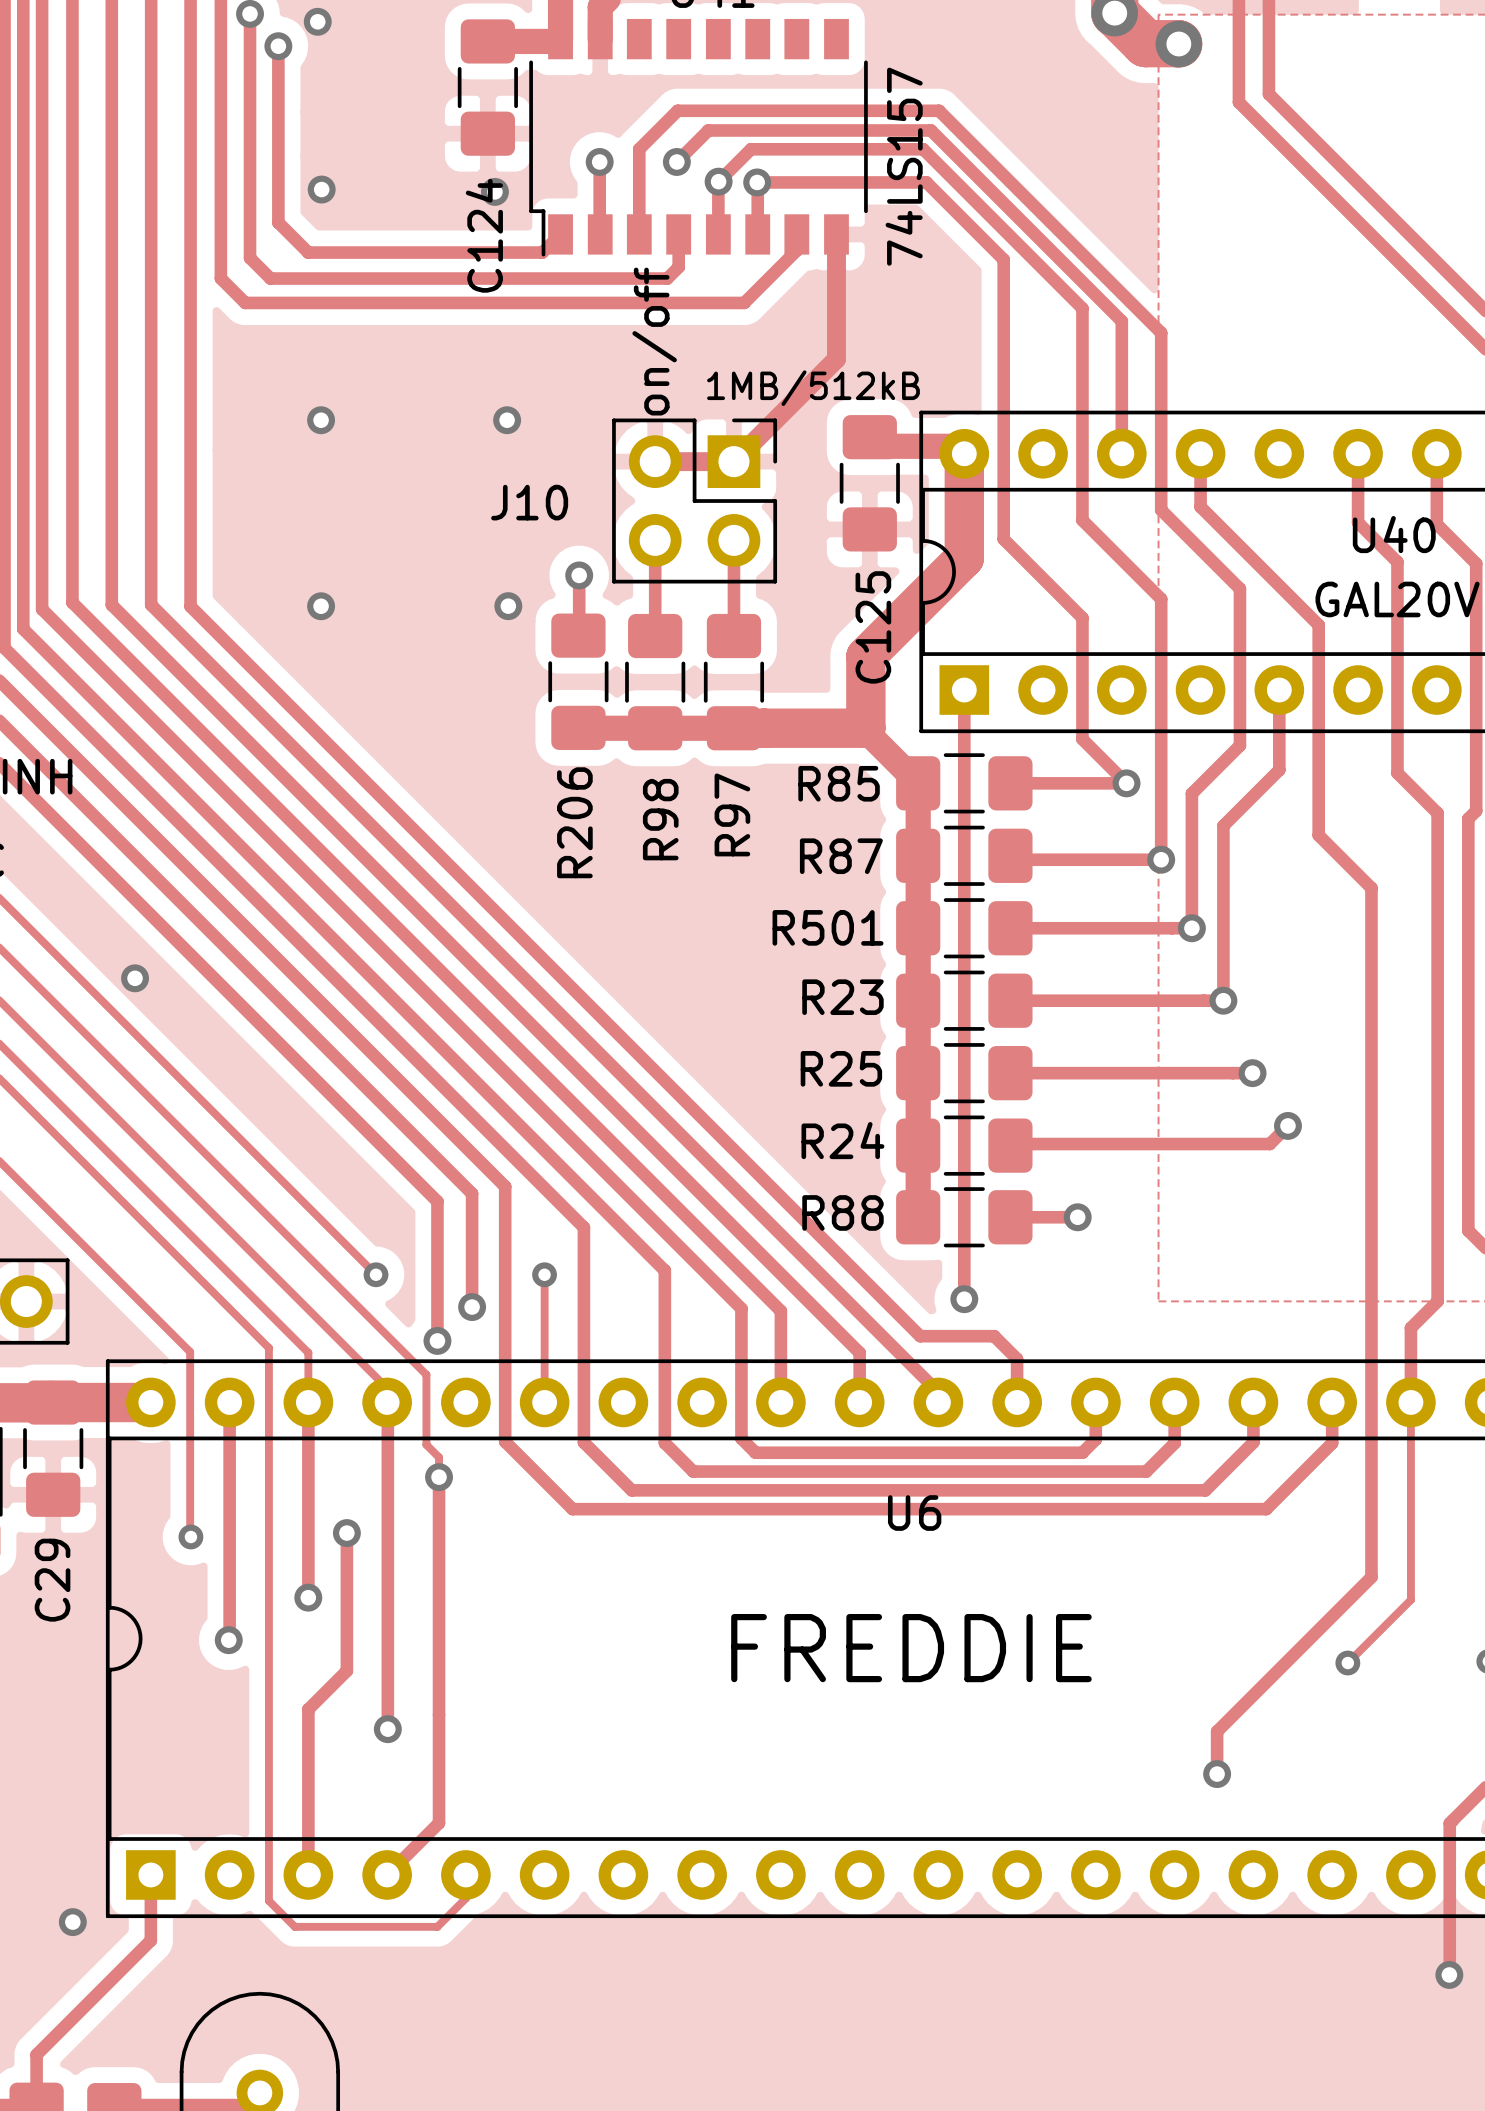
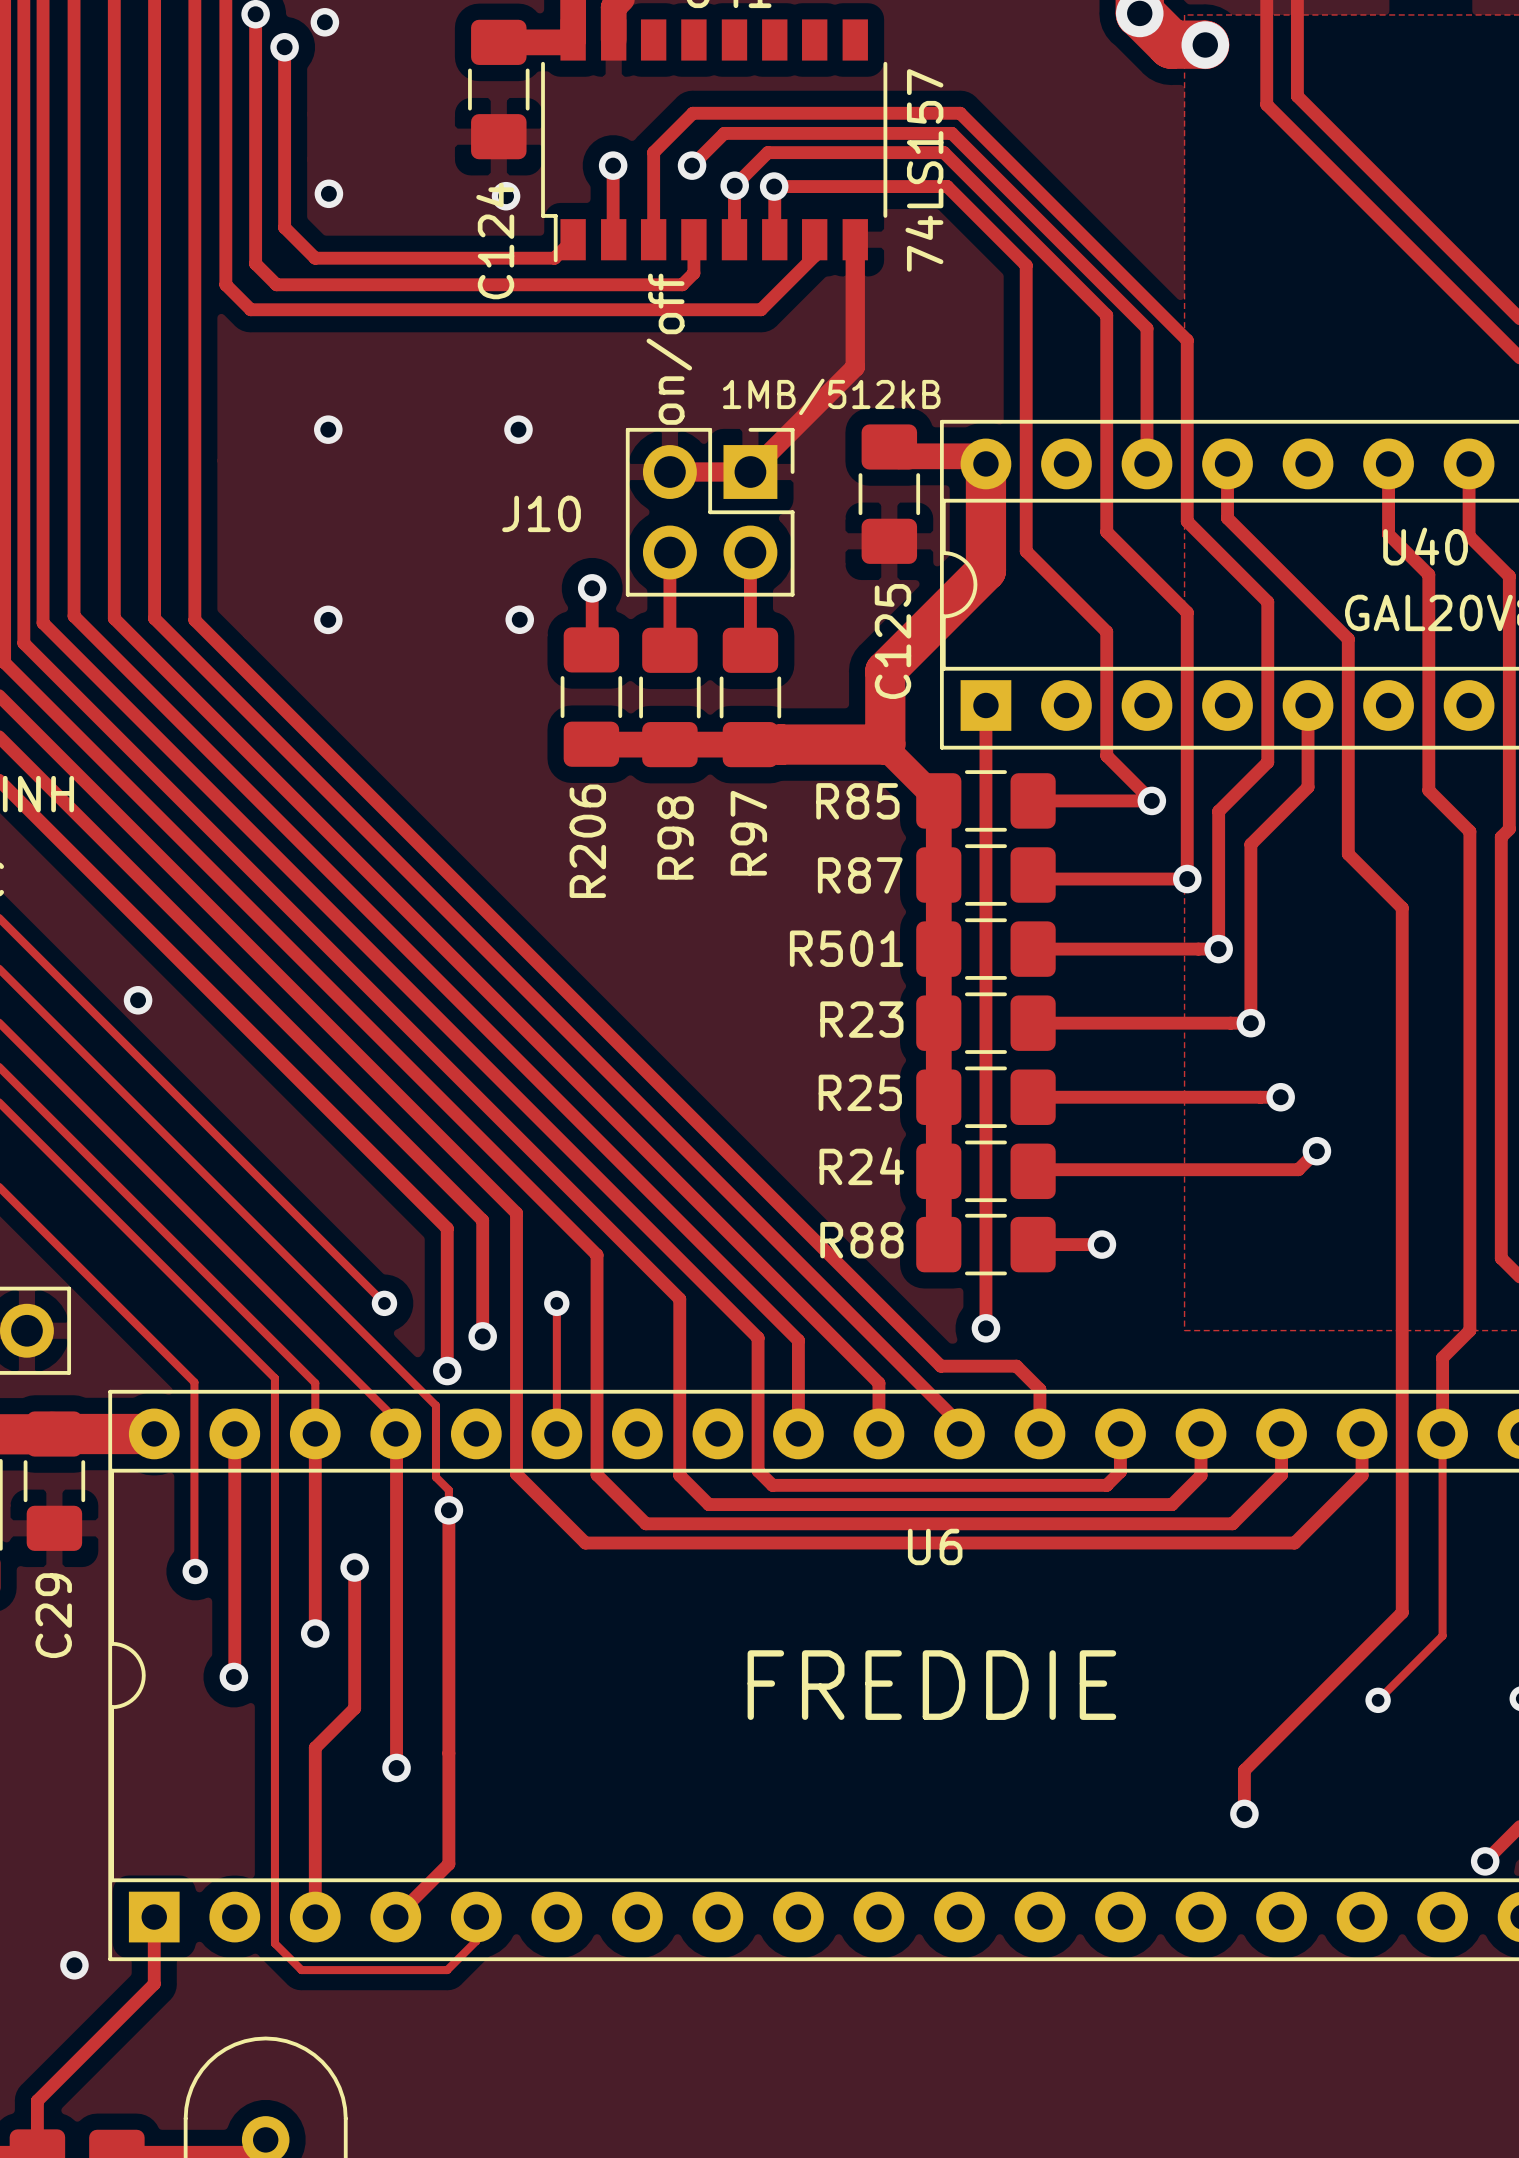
track: (1452, 1820) (1449, 1823) (1449, 1974) -> none
via position: (1449, 1974) -> (1485, 1861)

